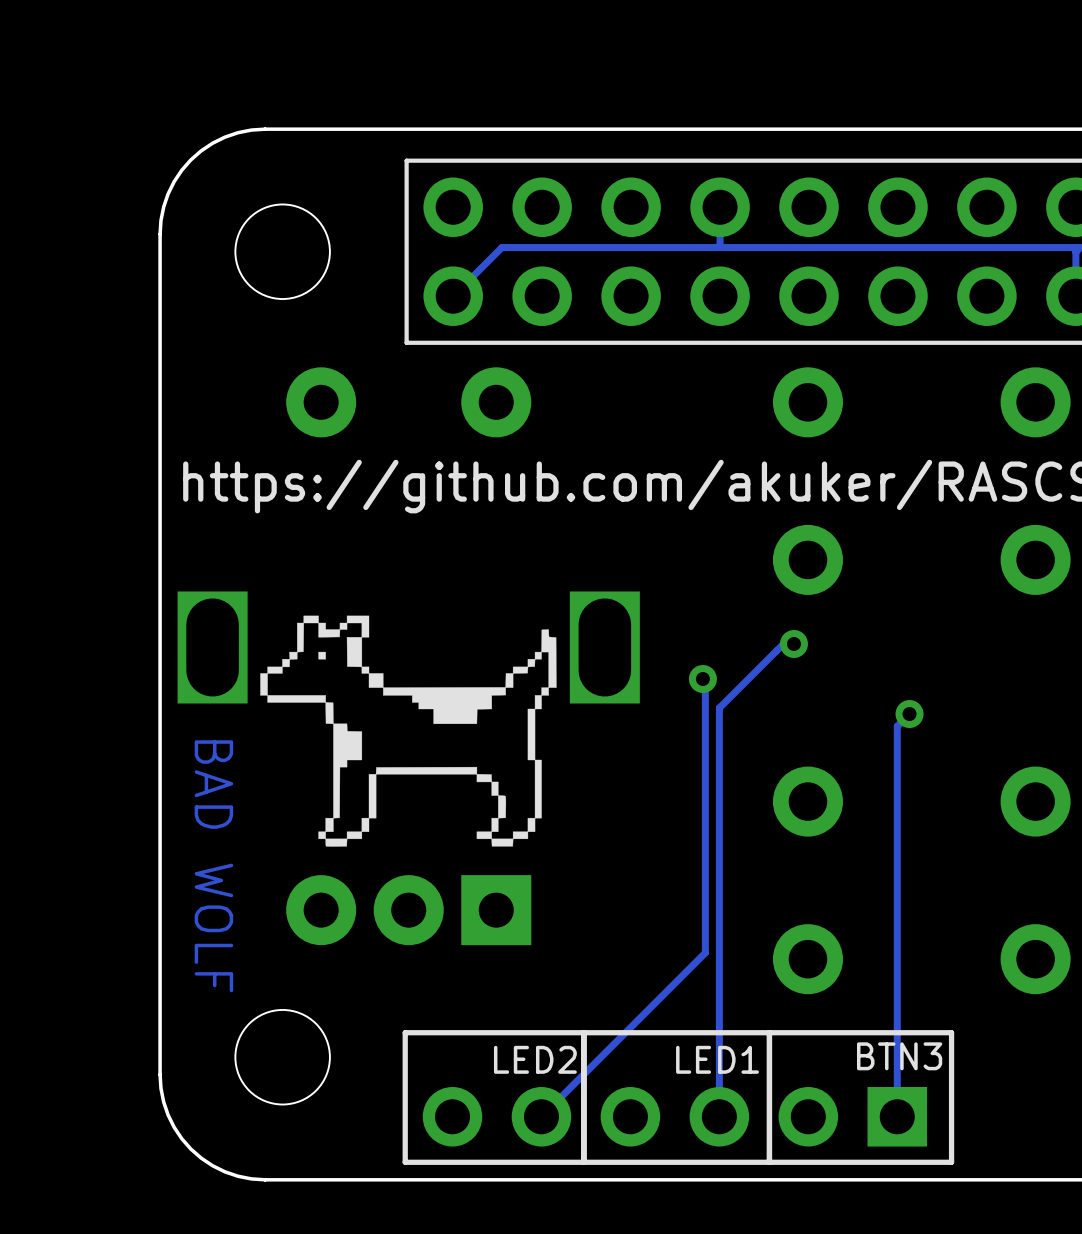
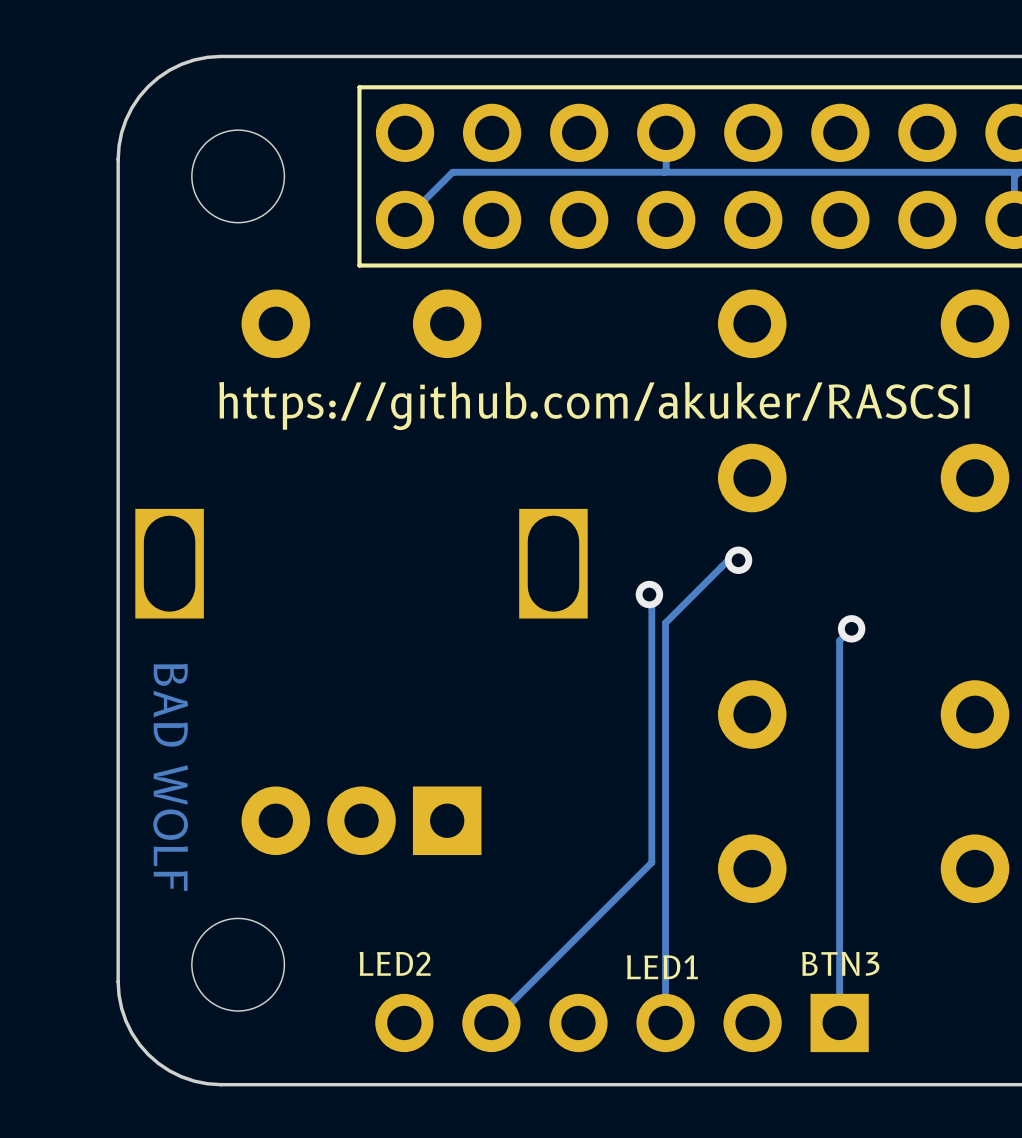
drawing: [260, 615, 557, 847] -> none
line: (583, 1032) (583, 1162) -> none
line: (769, 1032) (769, 1162) -> none
line: (951, 1032) (405, 1032) (405, 1162) (951, 1162) (951, 1032) -> none
text position: LED2 (535, 1059) -> LED2 (395, 963)

